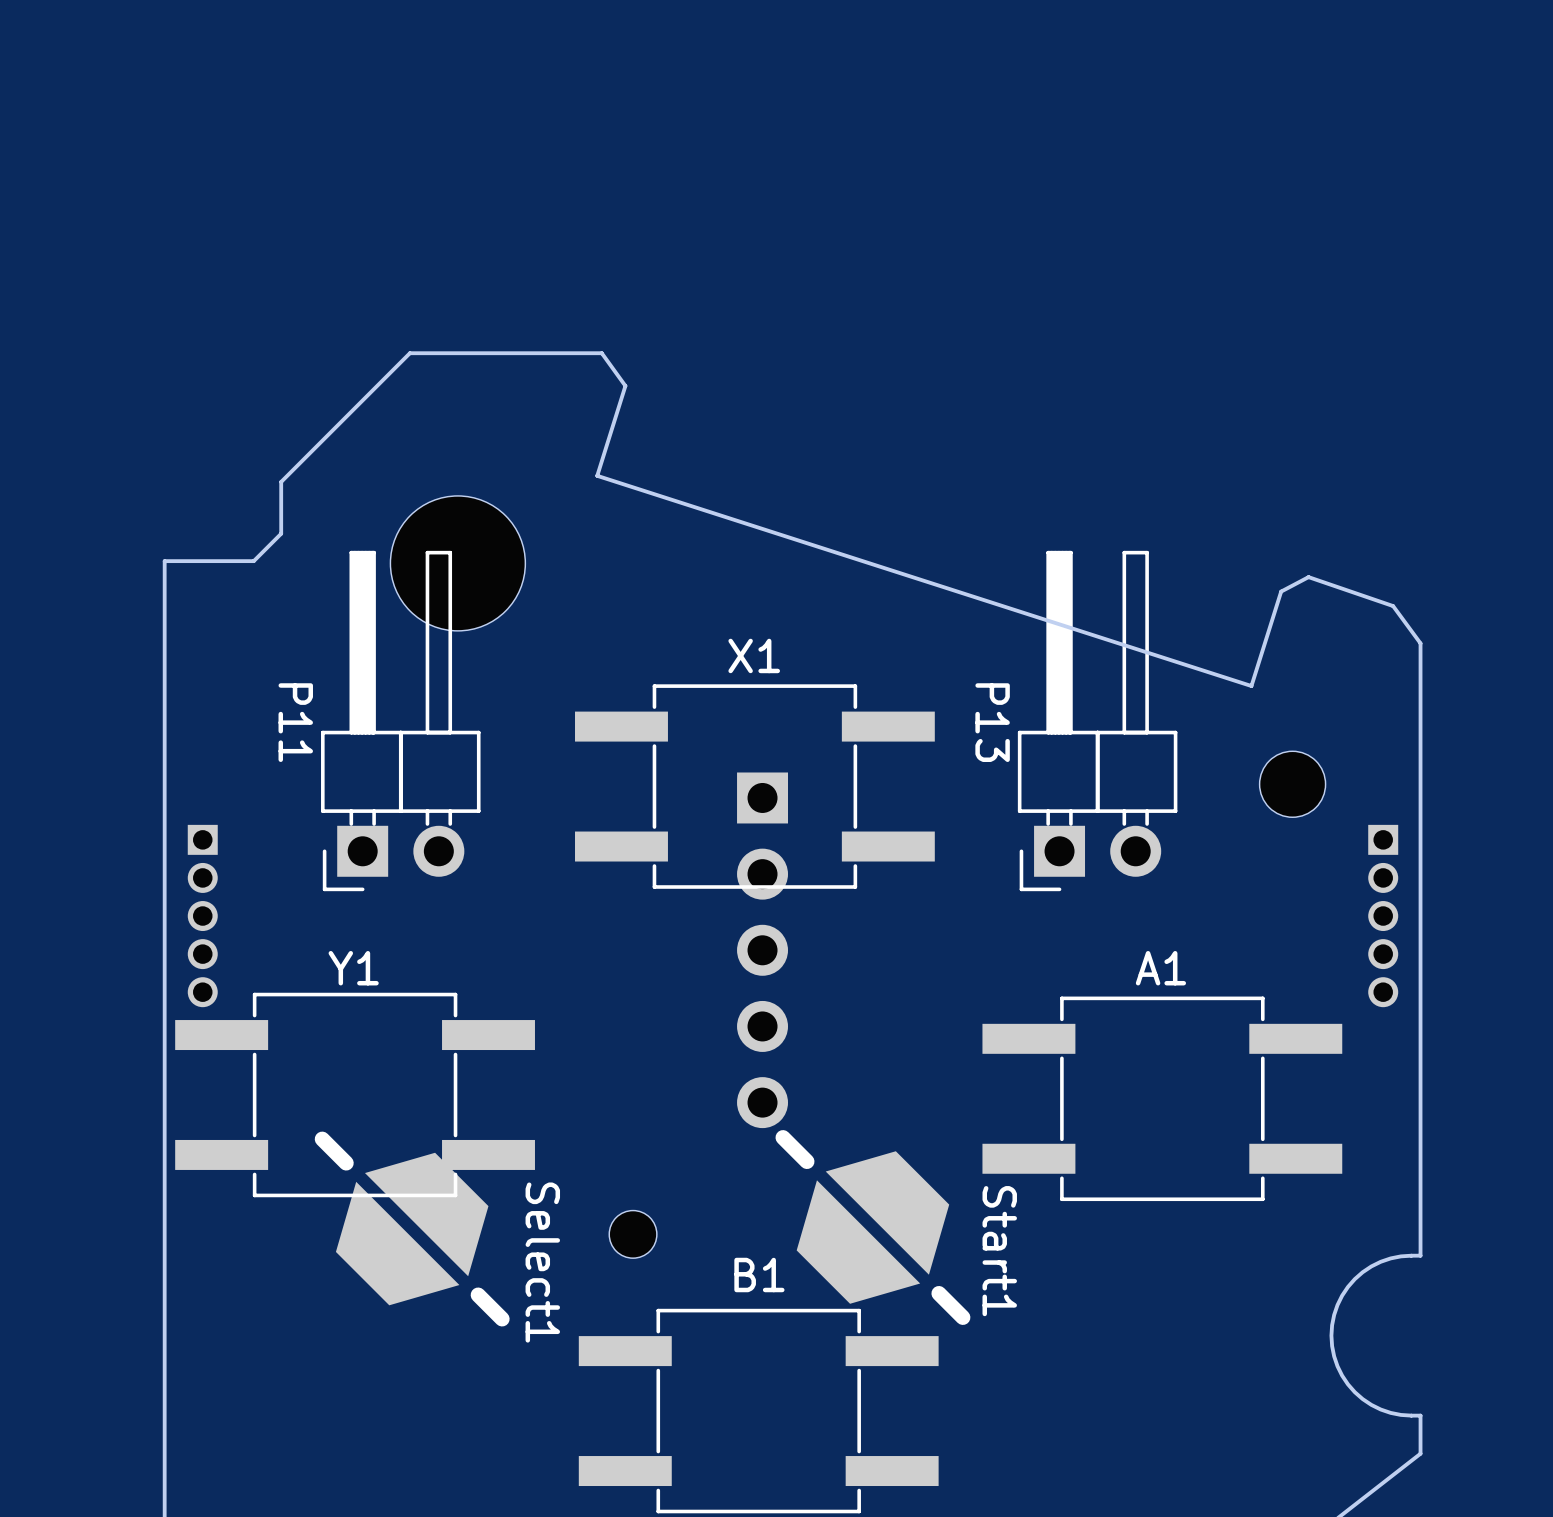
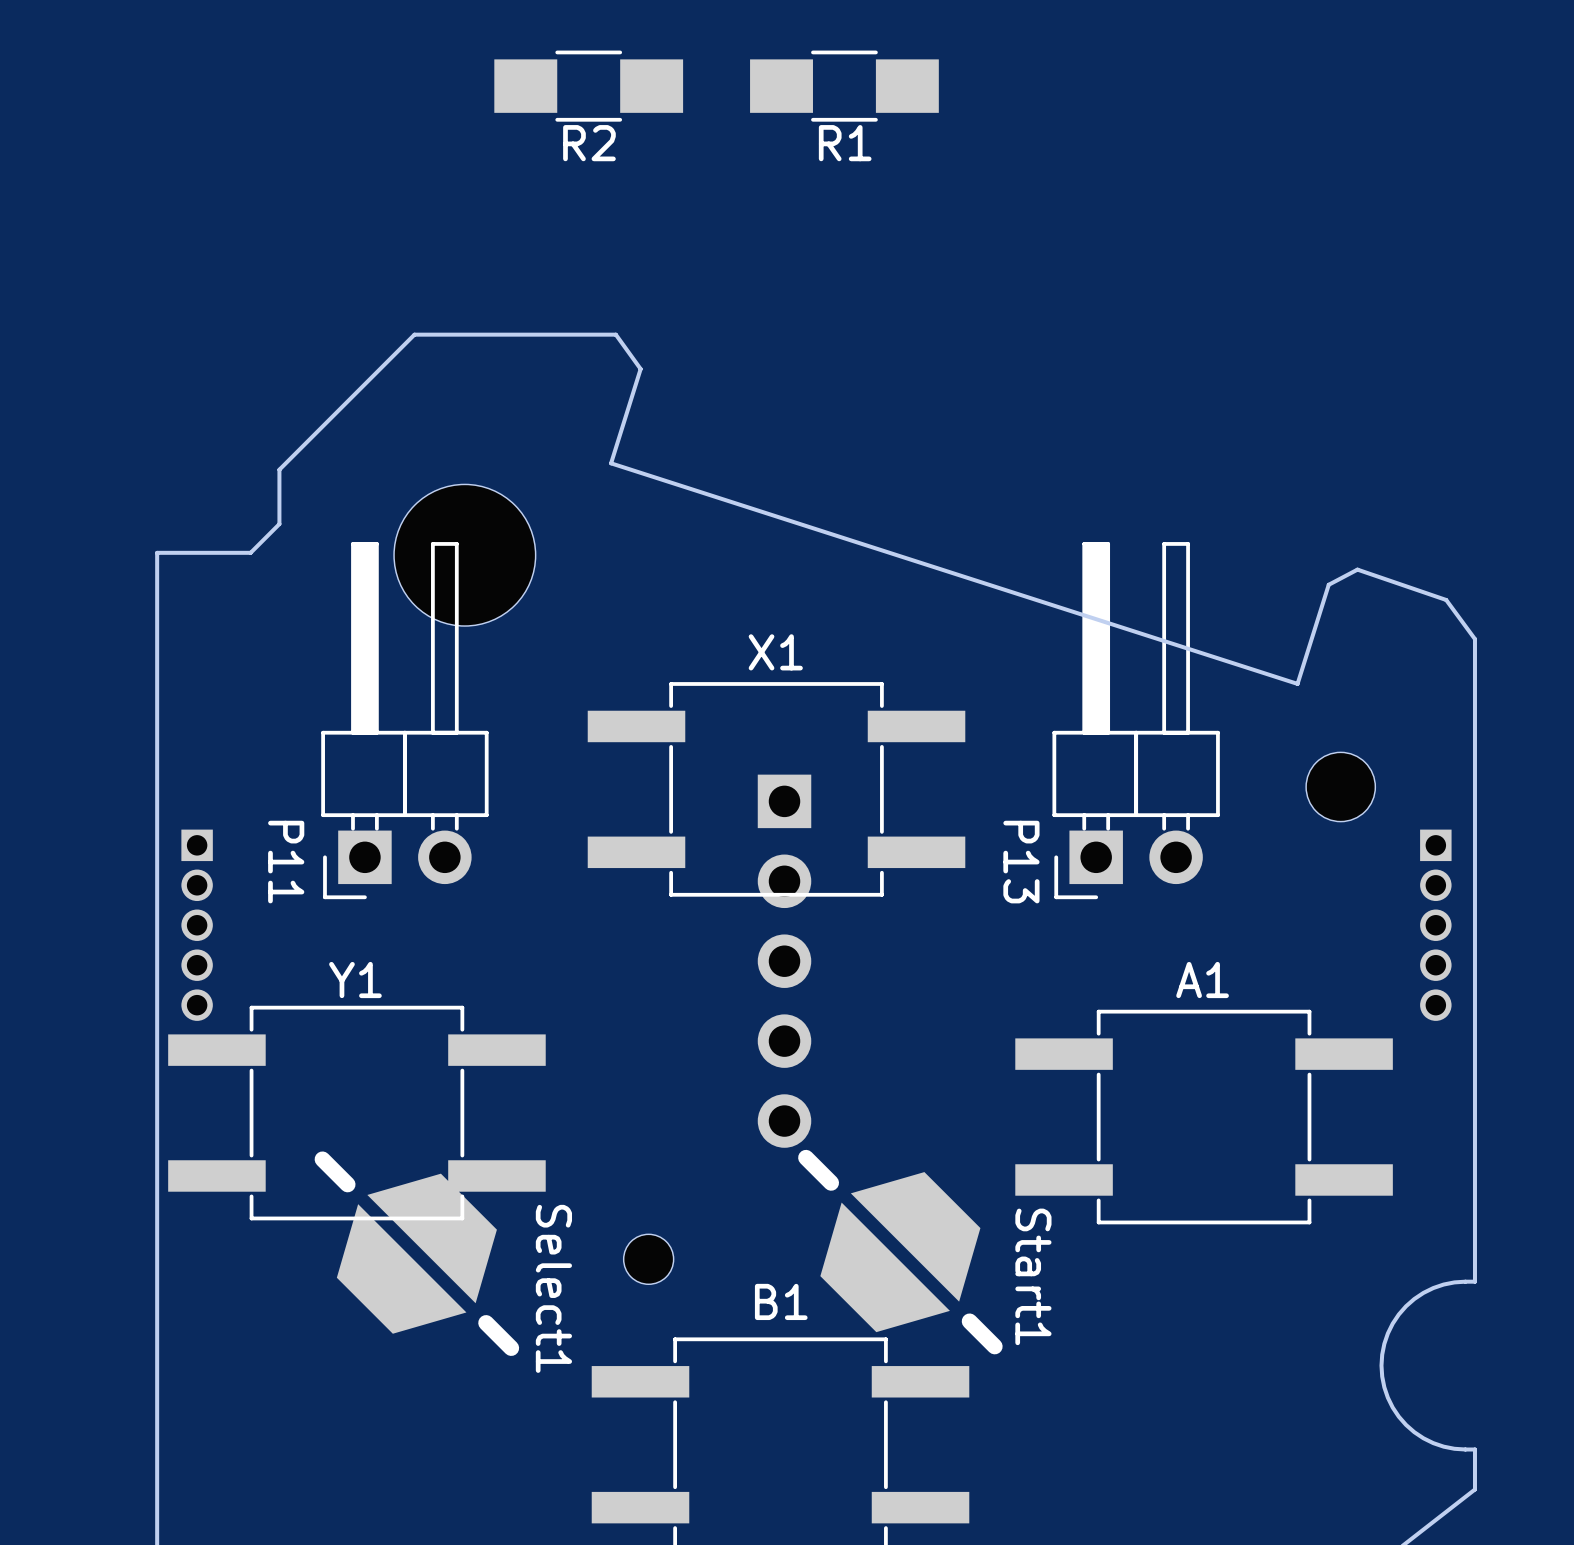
R2: none -> (588, 86)
R1: none -> (844, 86)
P11 name position: P11 (295, 722) -> P11 (286, 862)
P13 name position: P13 (992, 722) -> P13 (1021, 862)

